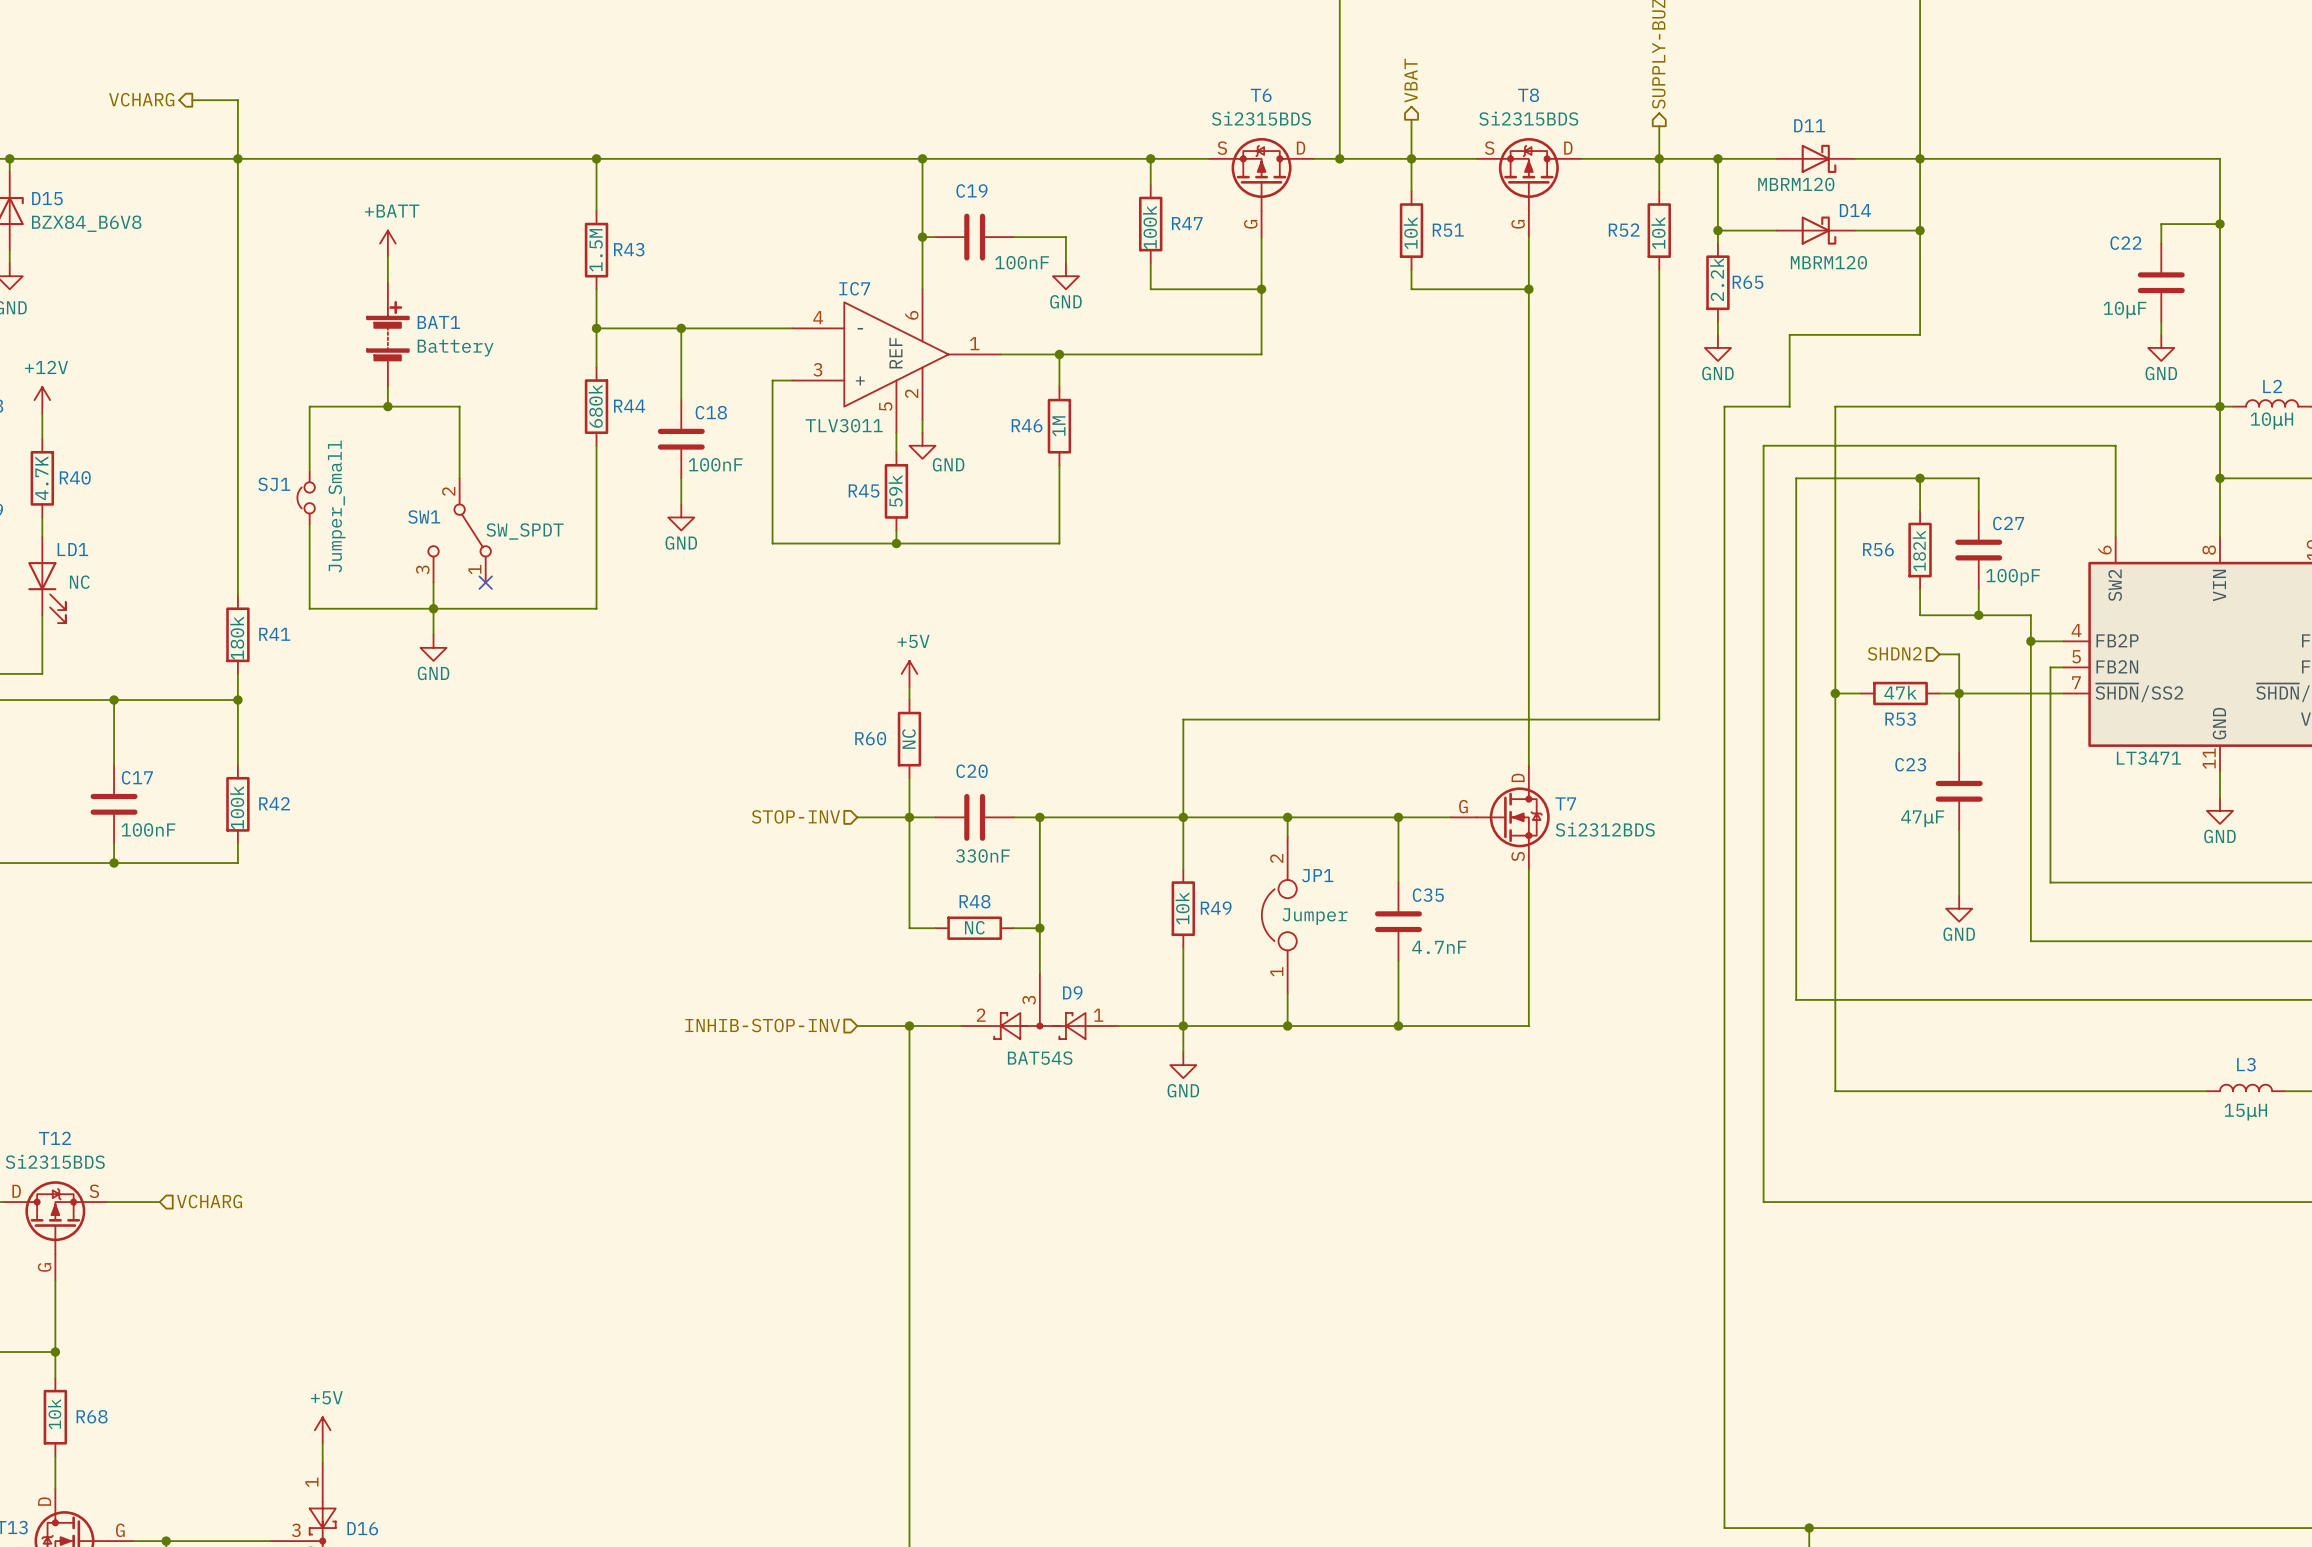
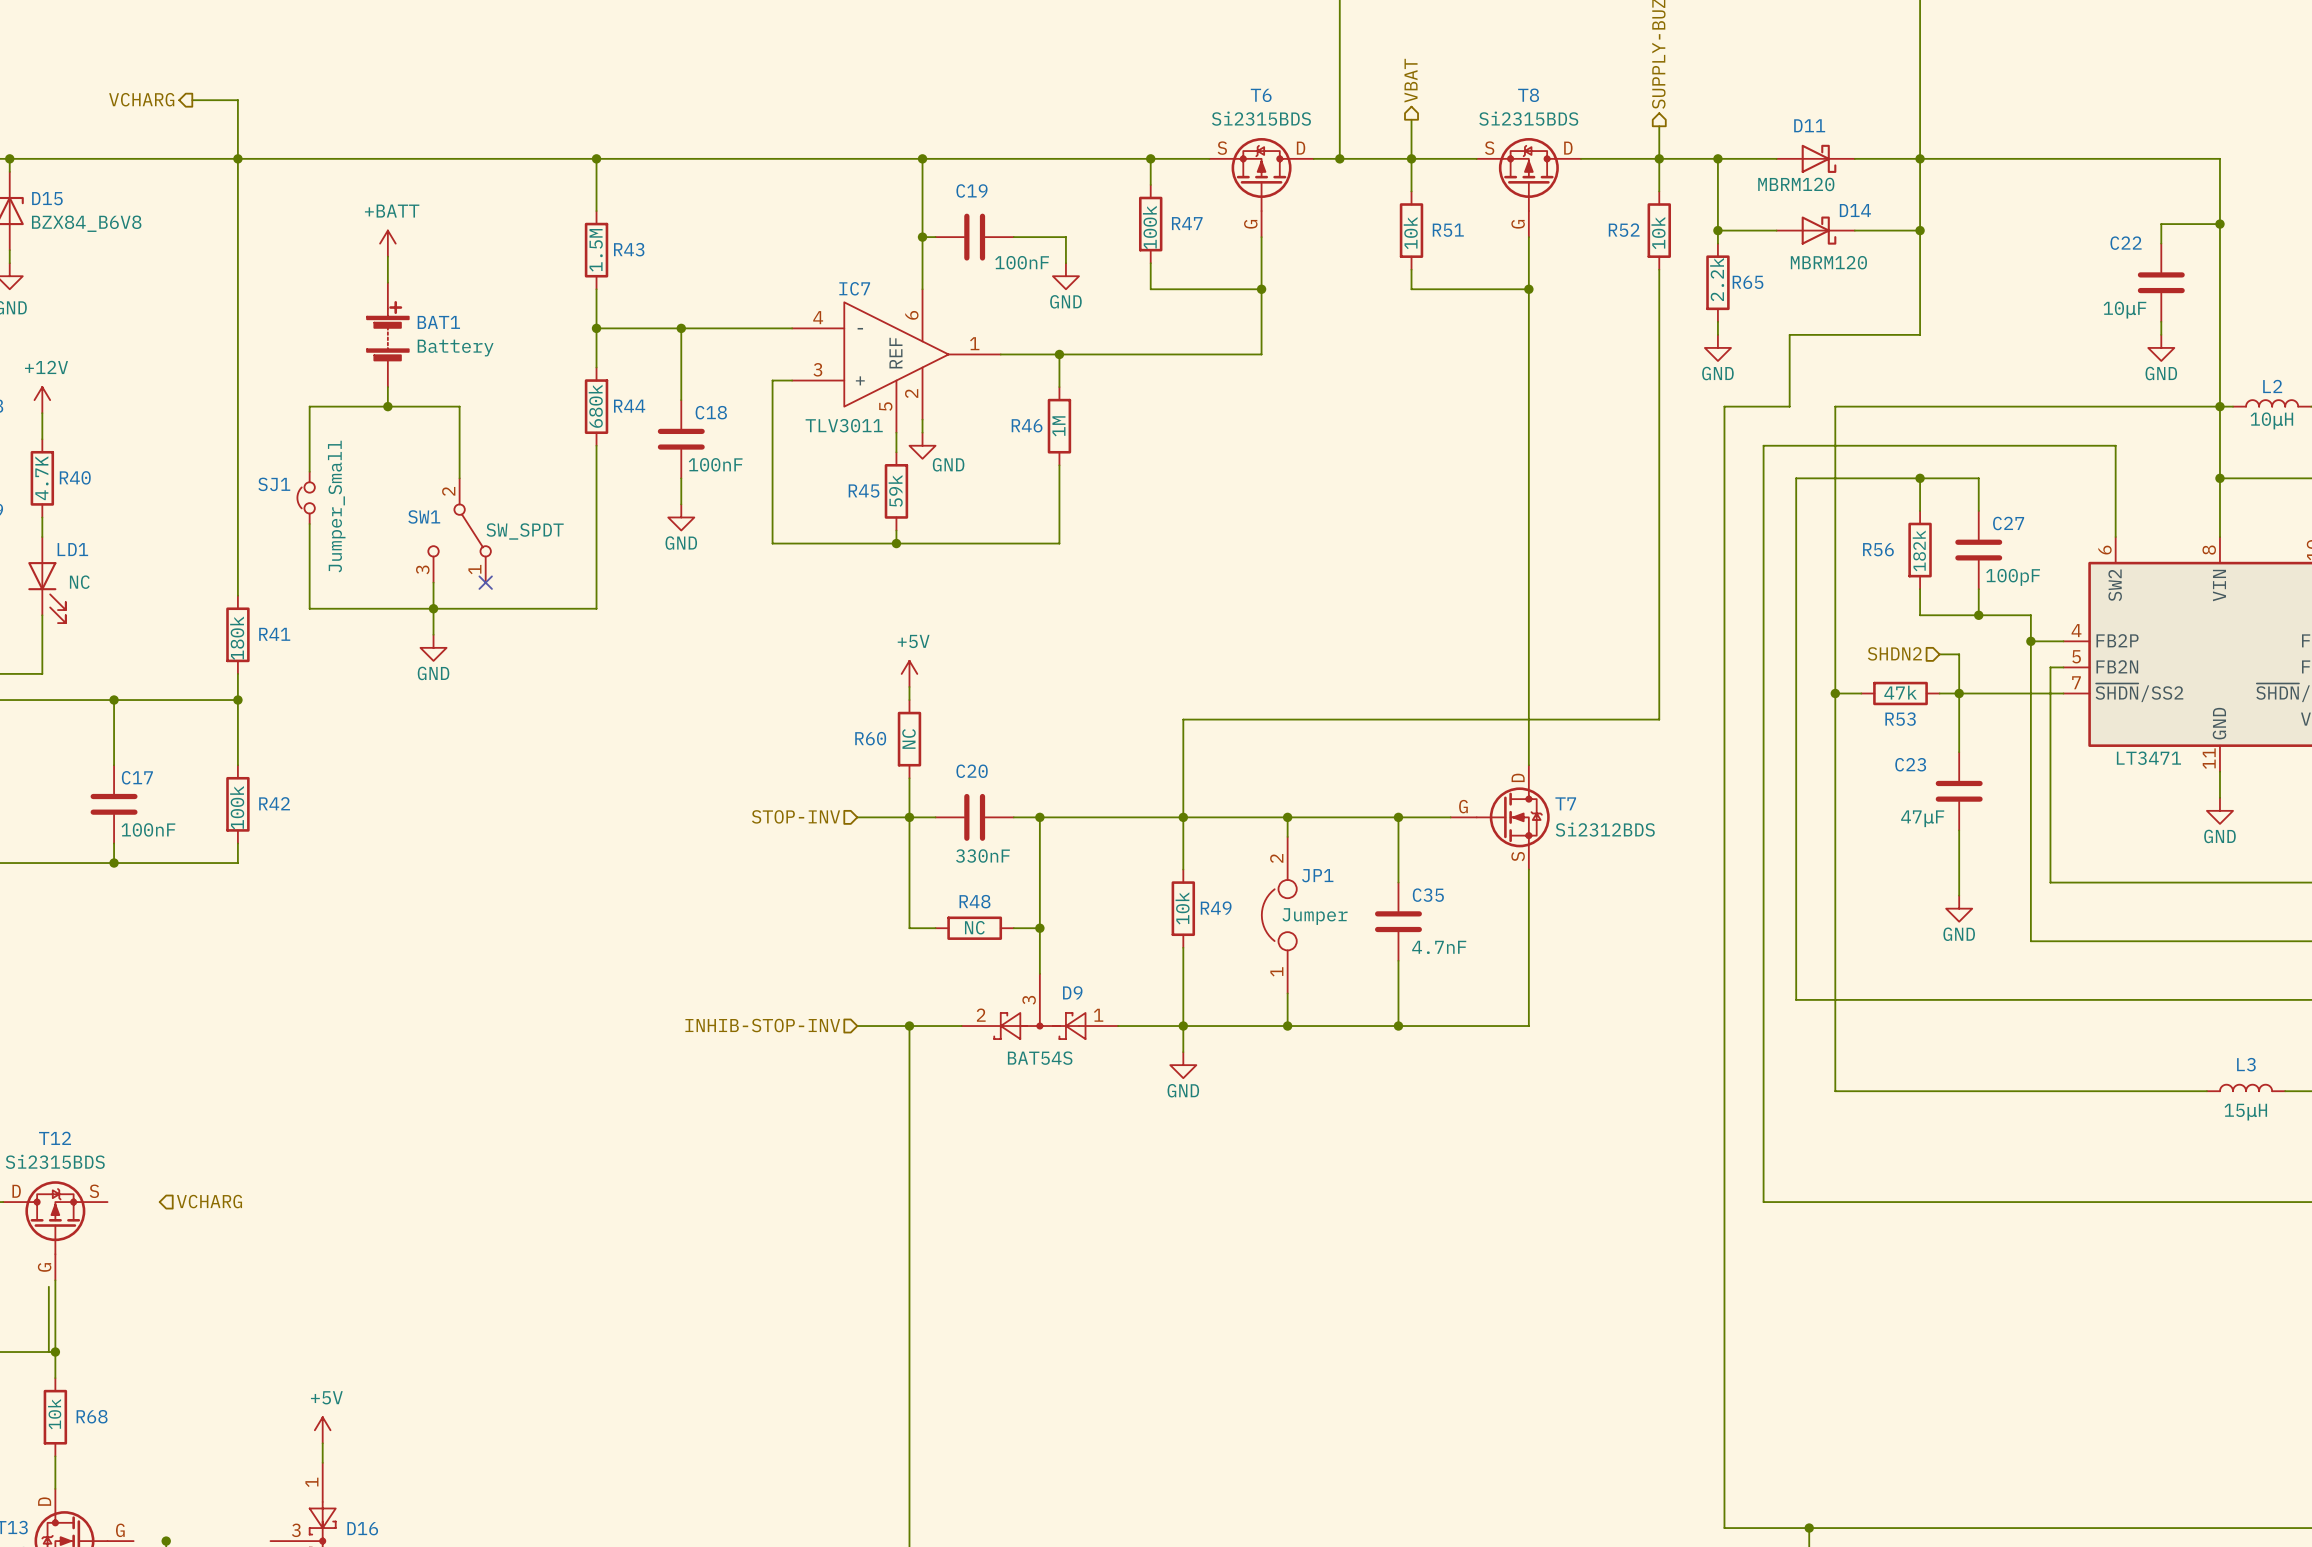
wire: (107, 1202) (159, 1202) -> none
wire: none -> (48, 1286) (48, 1352)
wire: (133, 1541) (270, 1541) -> none

